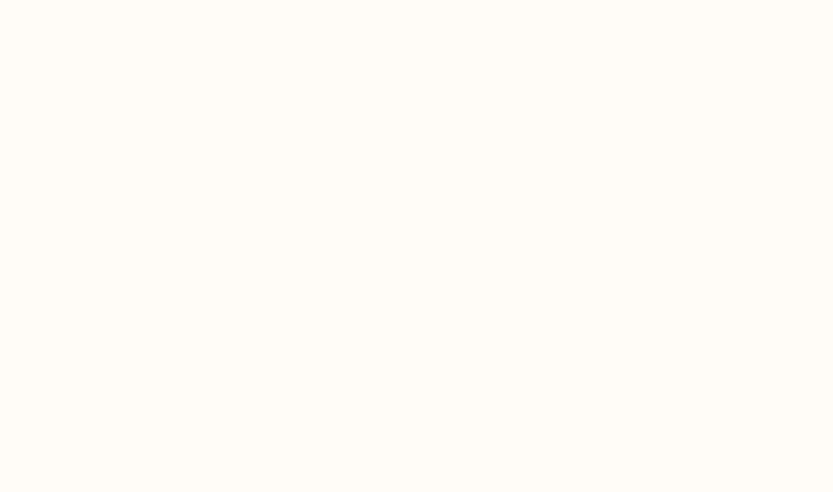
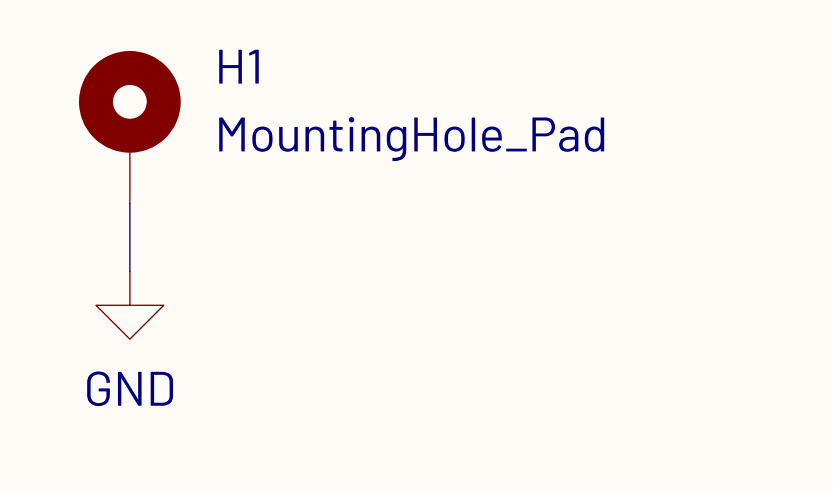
H1: none -> MountingHole_Pad (129, 127)
wire: none -> (129, 203) (129, 271)
power symbol: none -> GND (129, 305)

